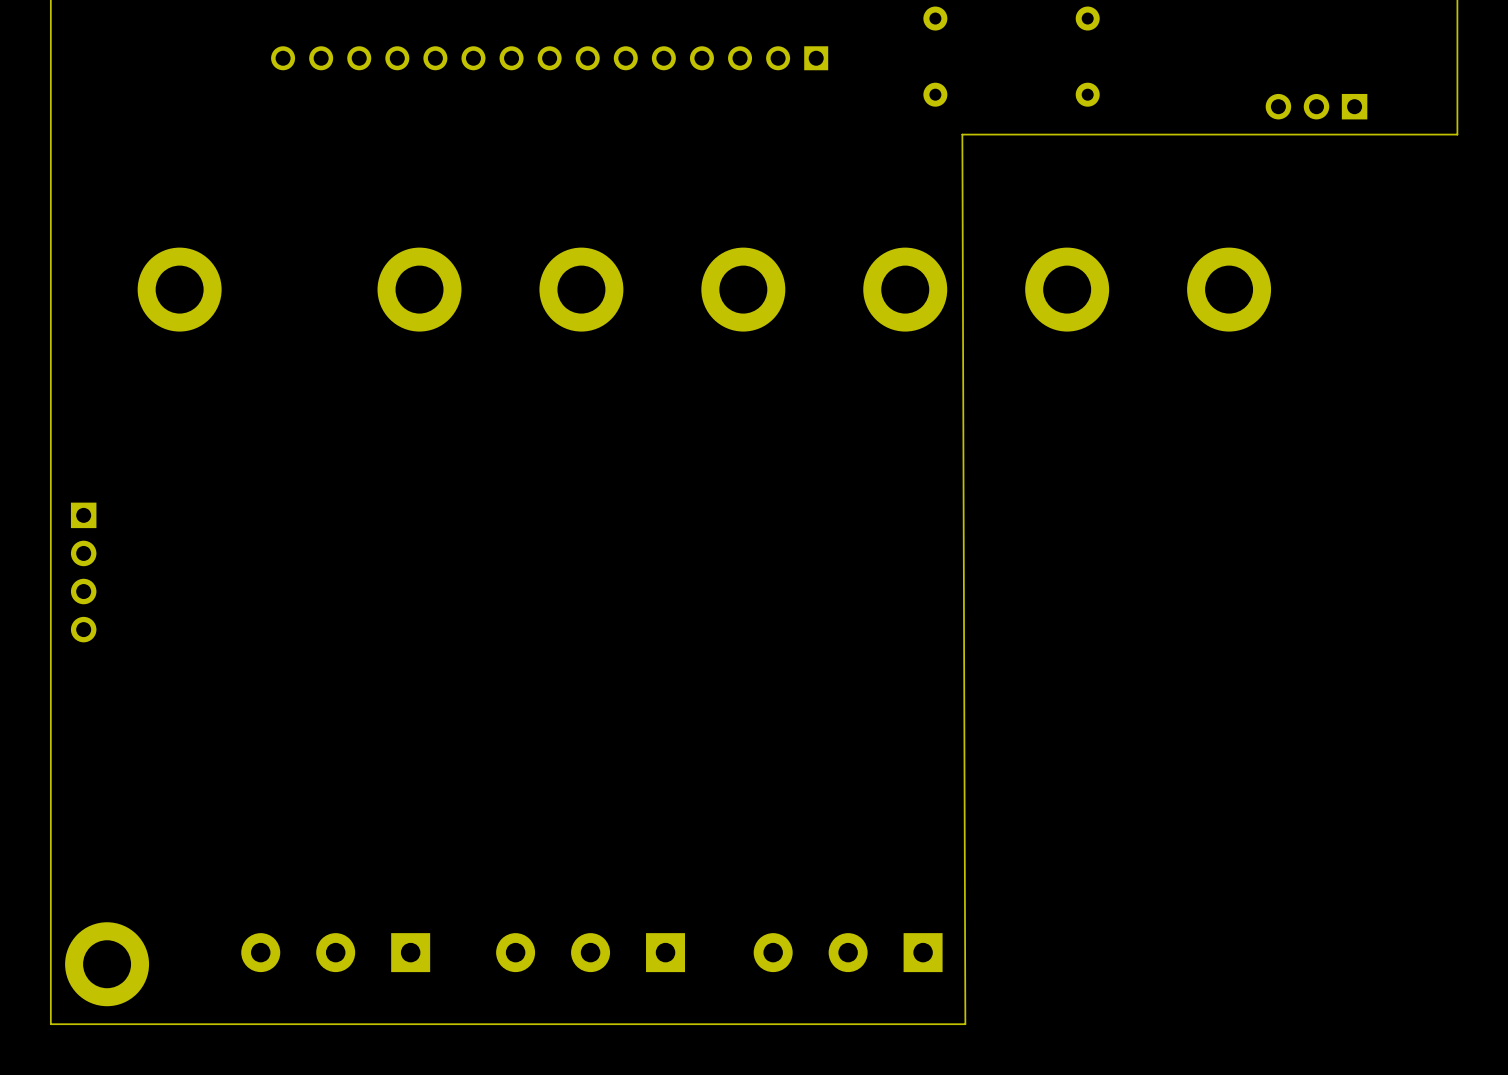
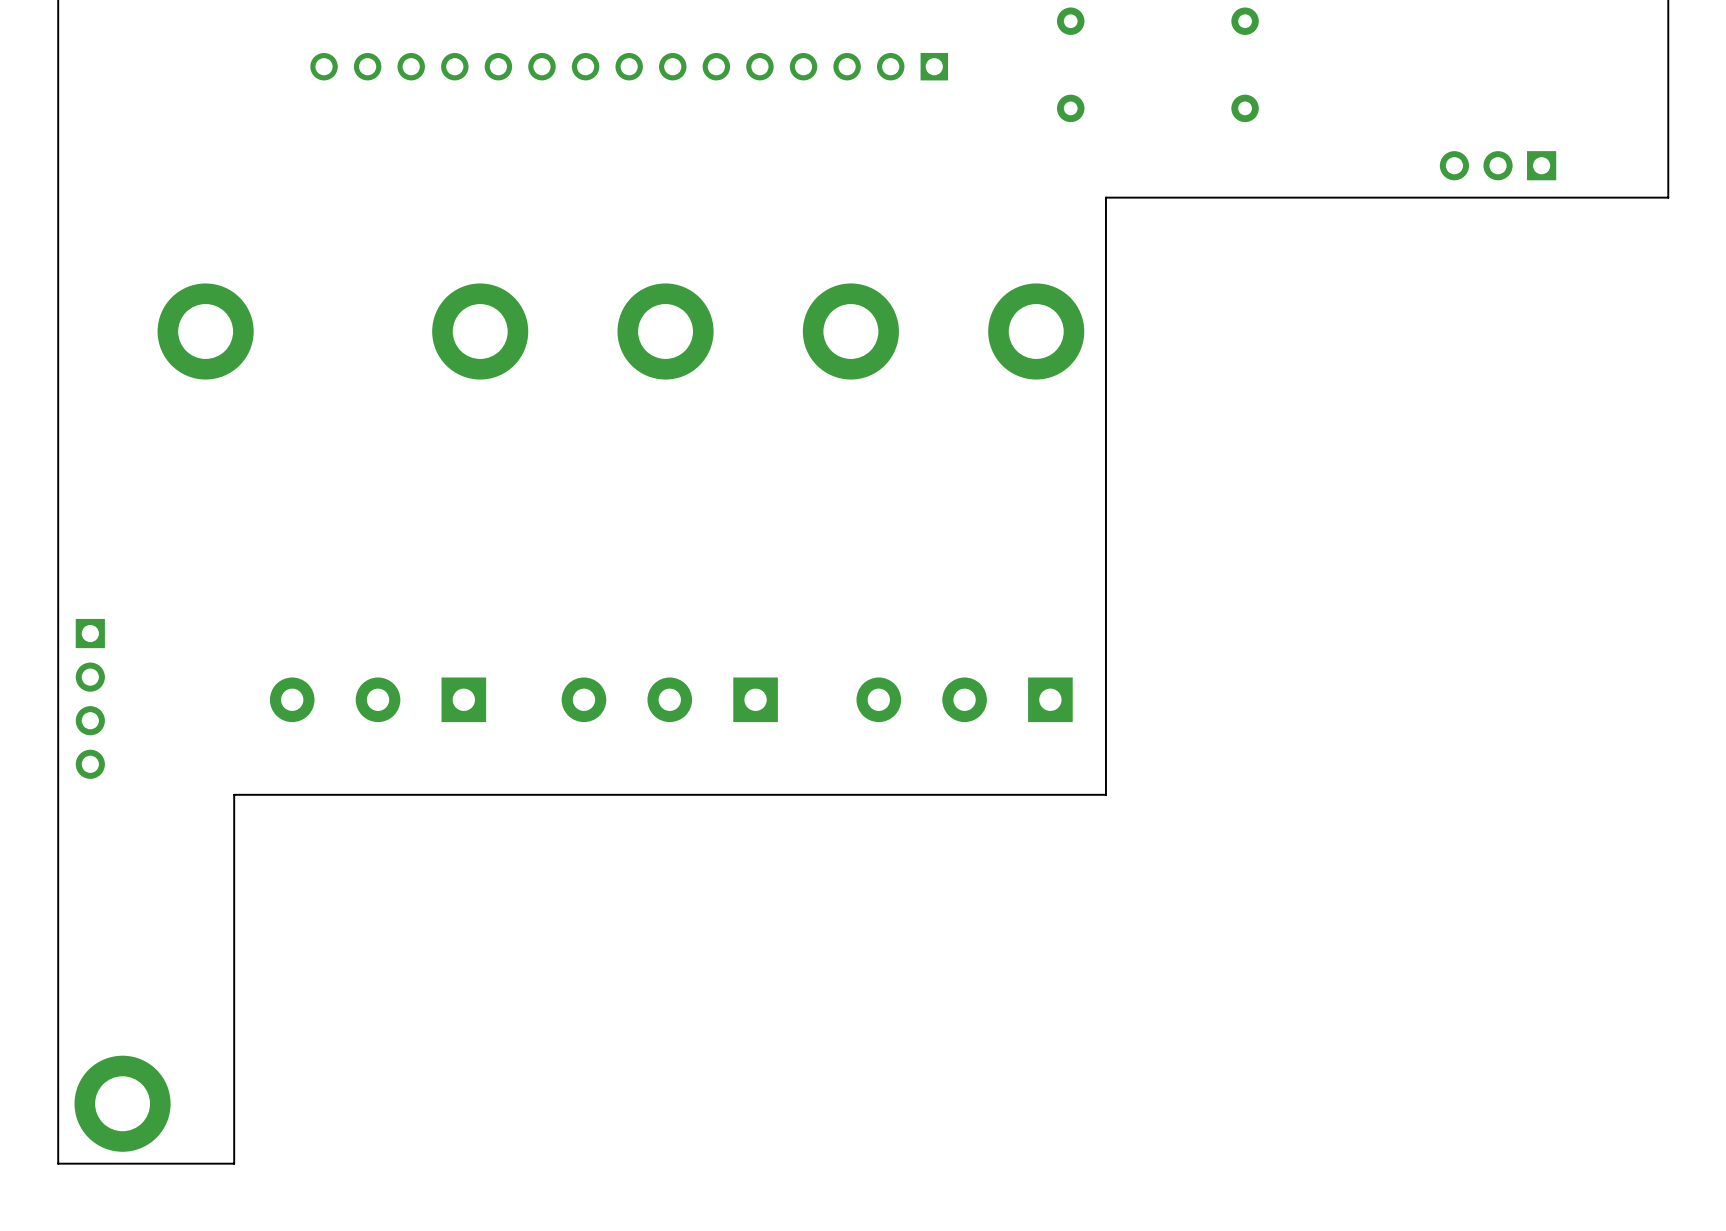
part position: (1316, 106) -> (1498, 165)
board edge: (1457, 134) (962, 134) (965, 1024) (50, 1024) (50, 1016) -> (1668, 154) (1668, 197) (1105, 197) (1105, 794) (234, 794) (234, 1163) (58, 1163)
part: (1067, 289) -> none
part: (1229, 289) -> none
part position: (83, 572) -> (90, 698)
part: none -> (378, 699)
part: none -> (669, 699)
part: none -> (964, 699)
part: (335, 952) -> none
part: (590, 952) -> none
part: (848, 952) -> none

